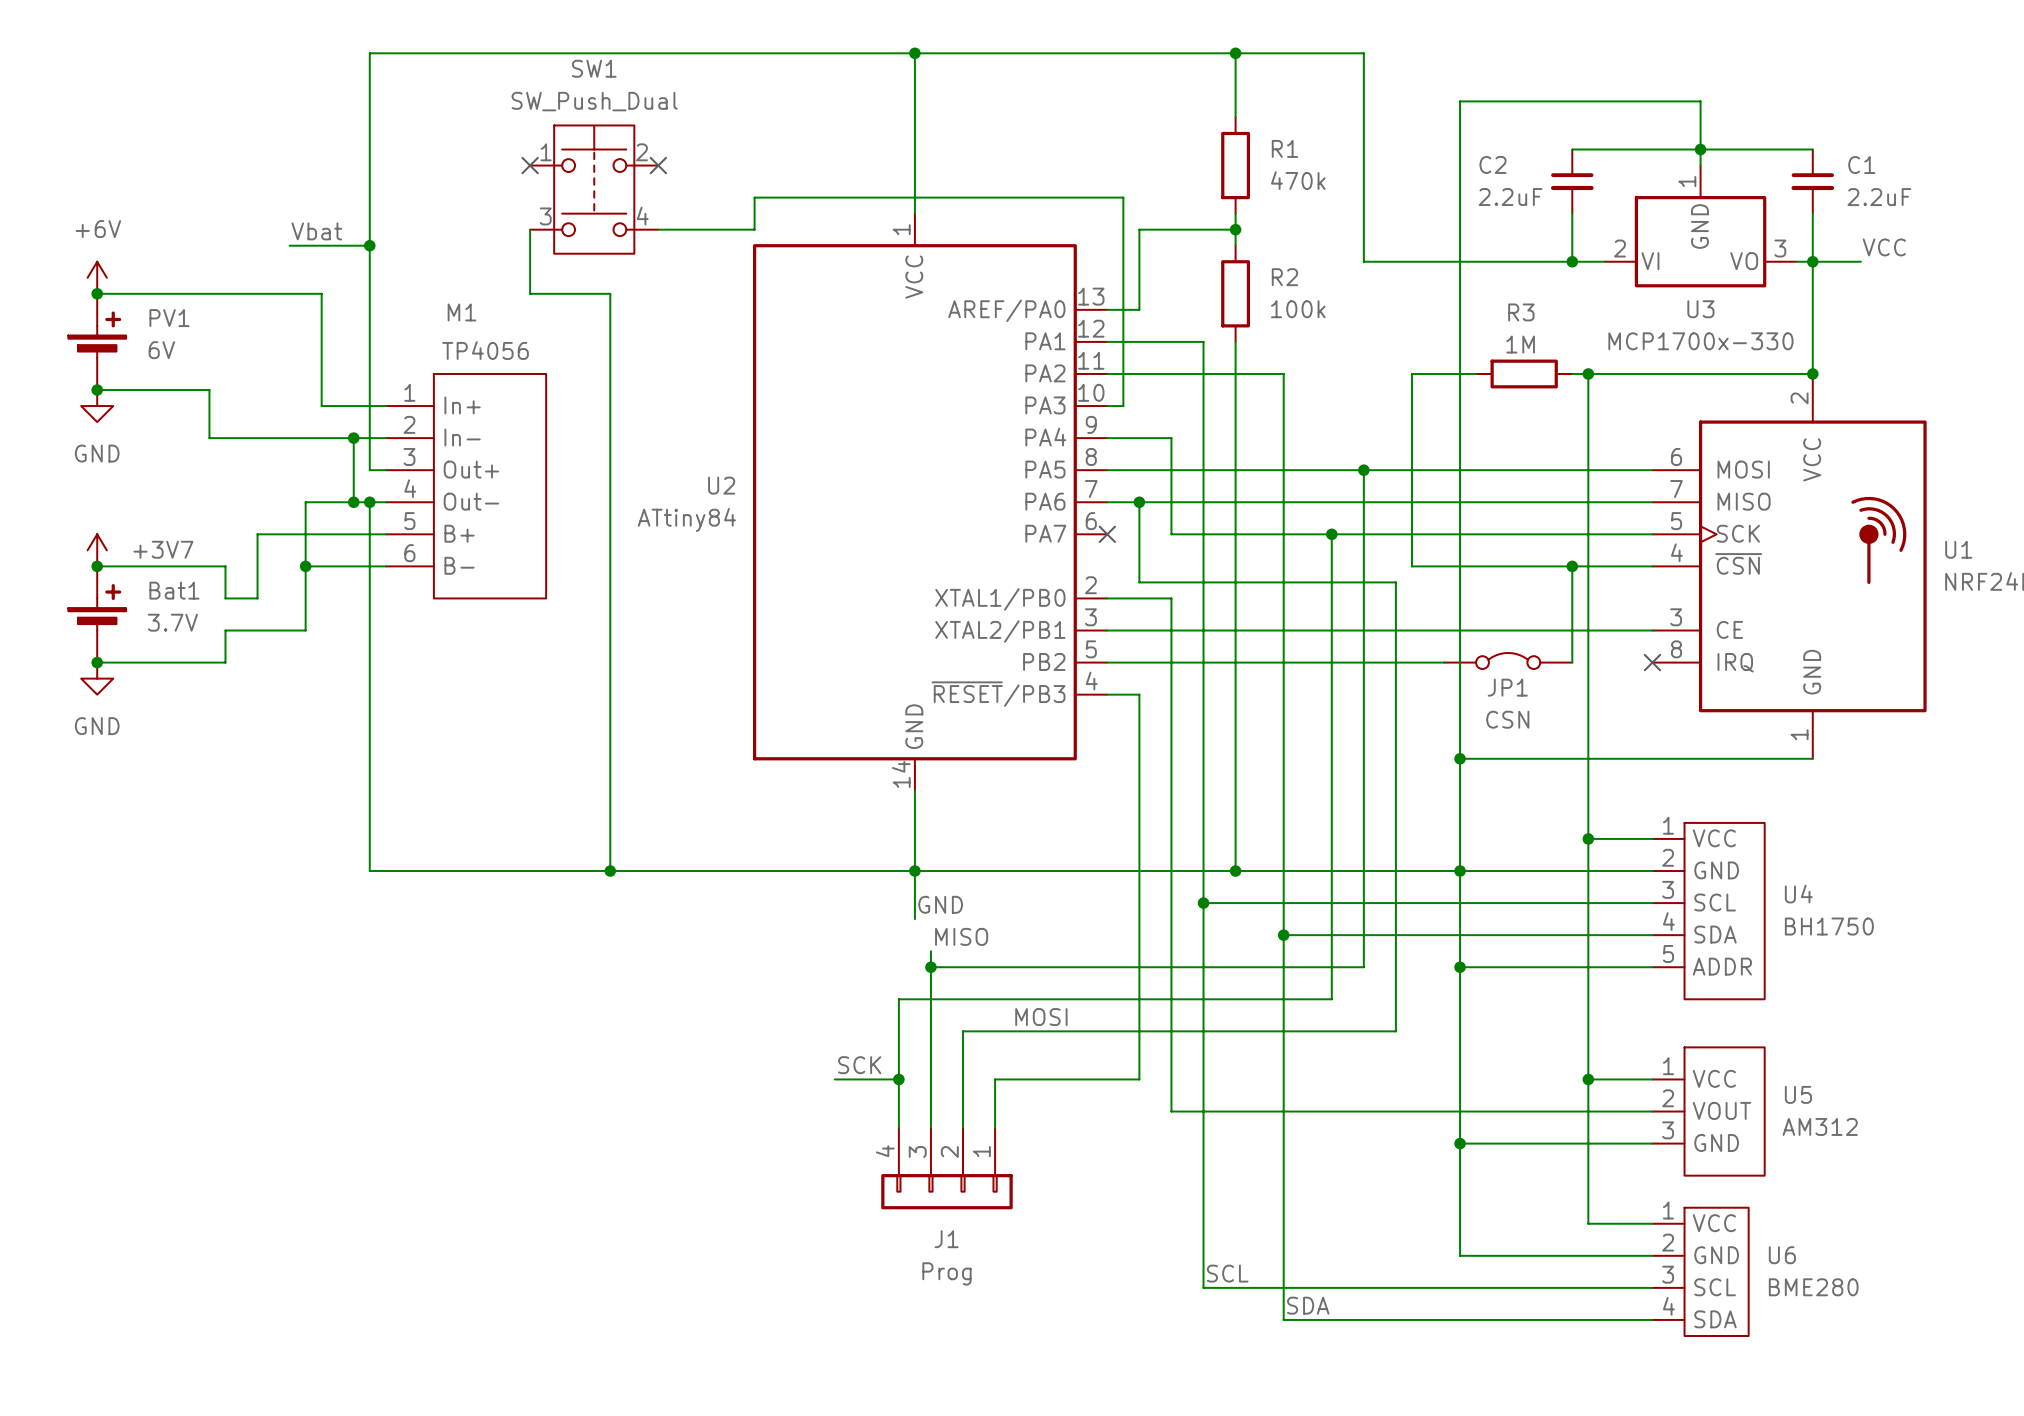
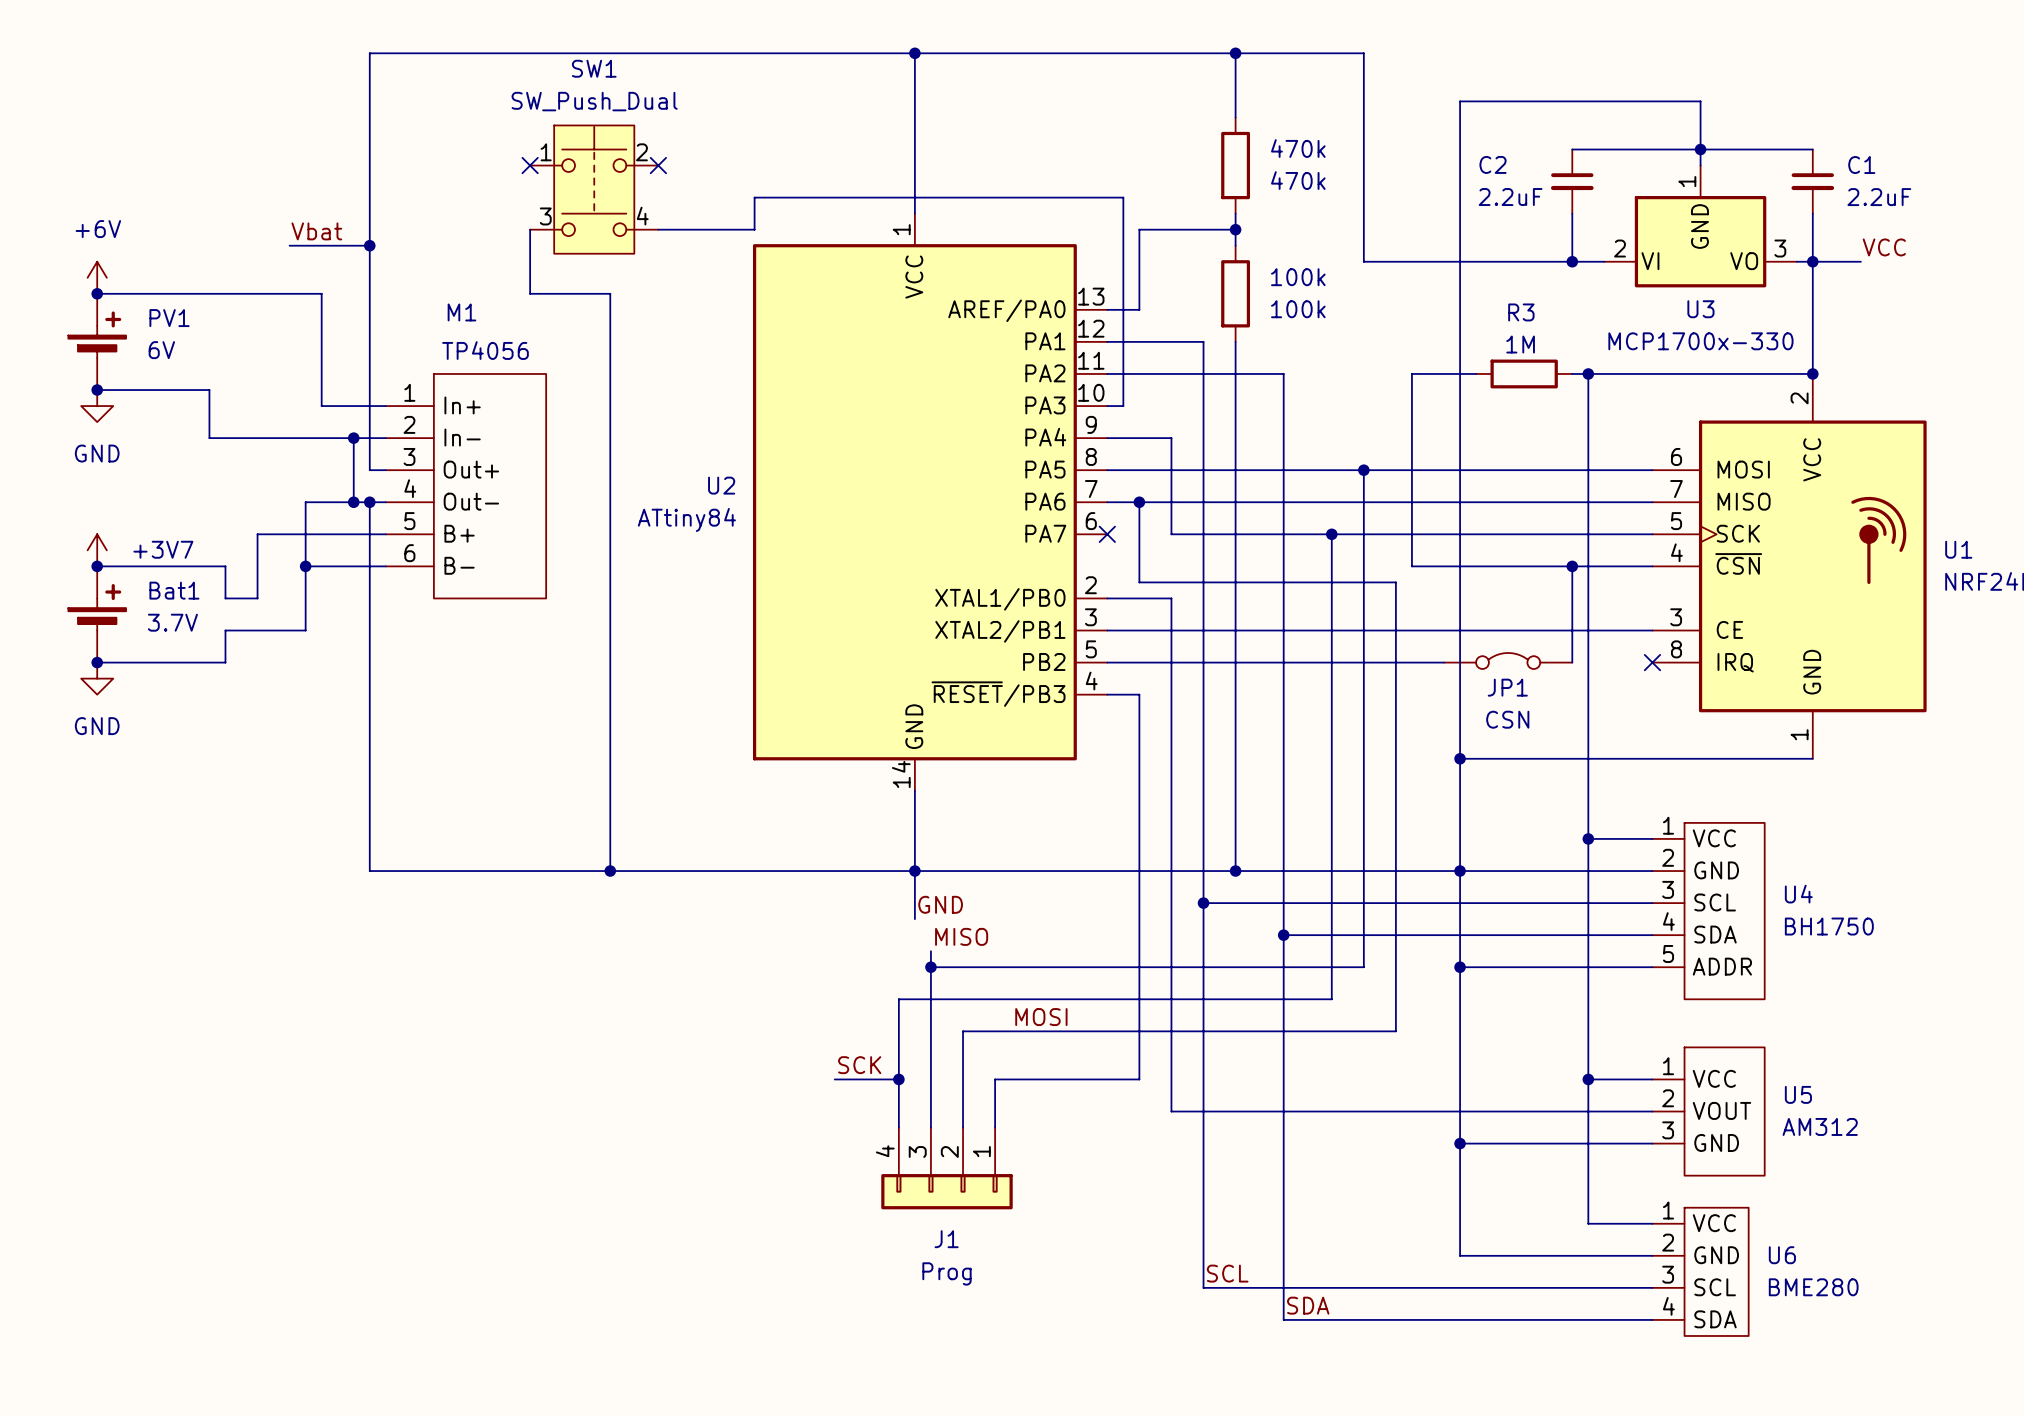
R1 name: R1 (1284, 148) -> 470k (1298, 148)
R2 name: R2 (1284, 277) -> 100k (1298, 277)

